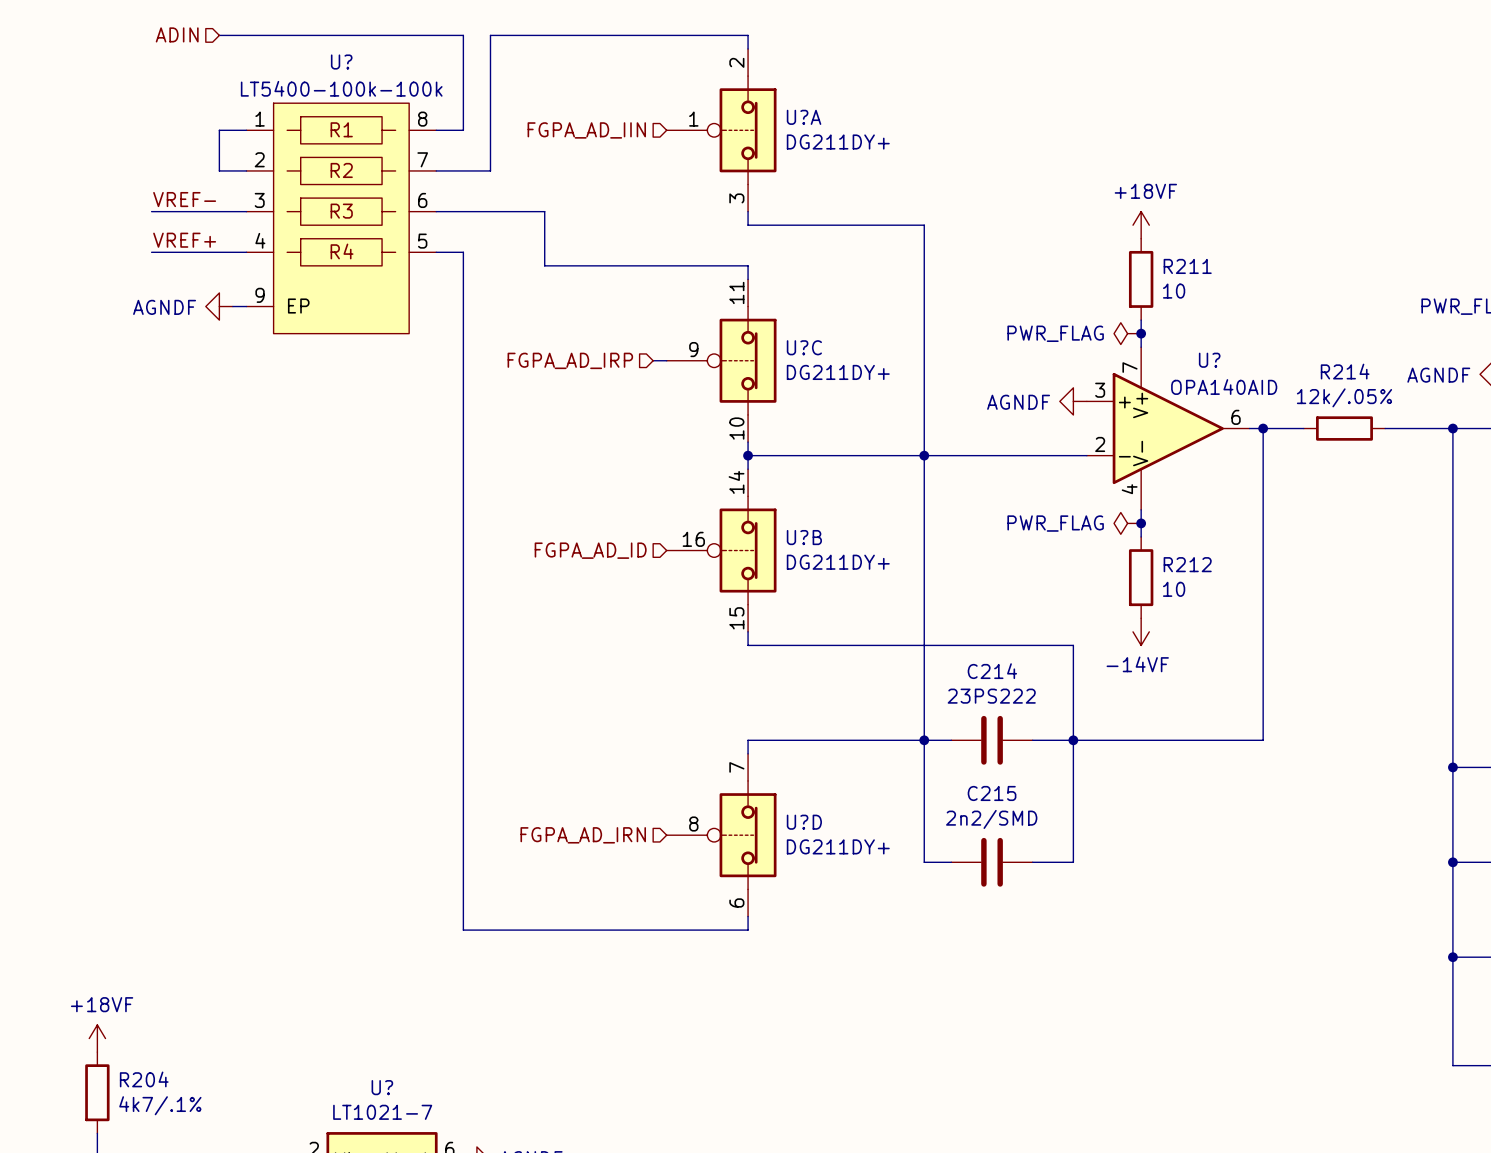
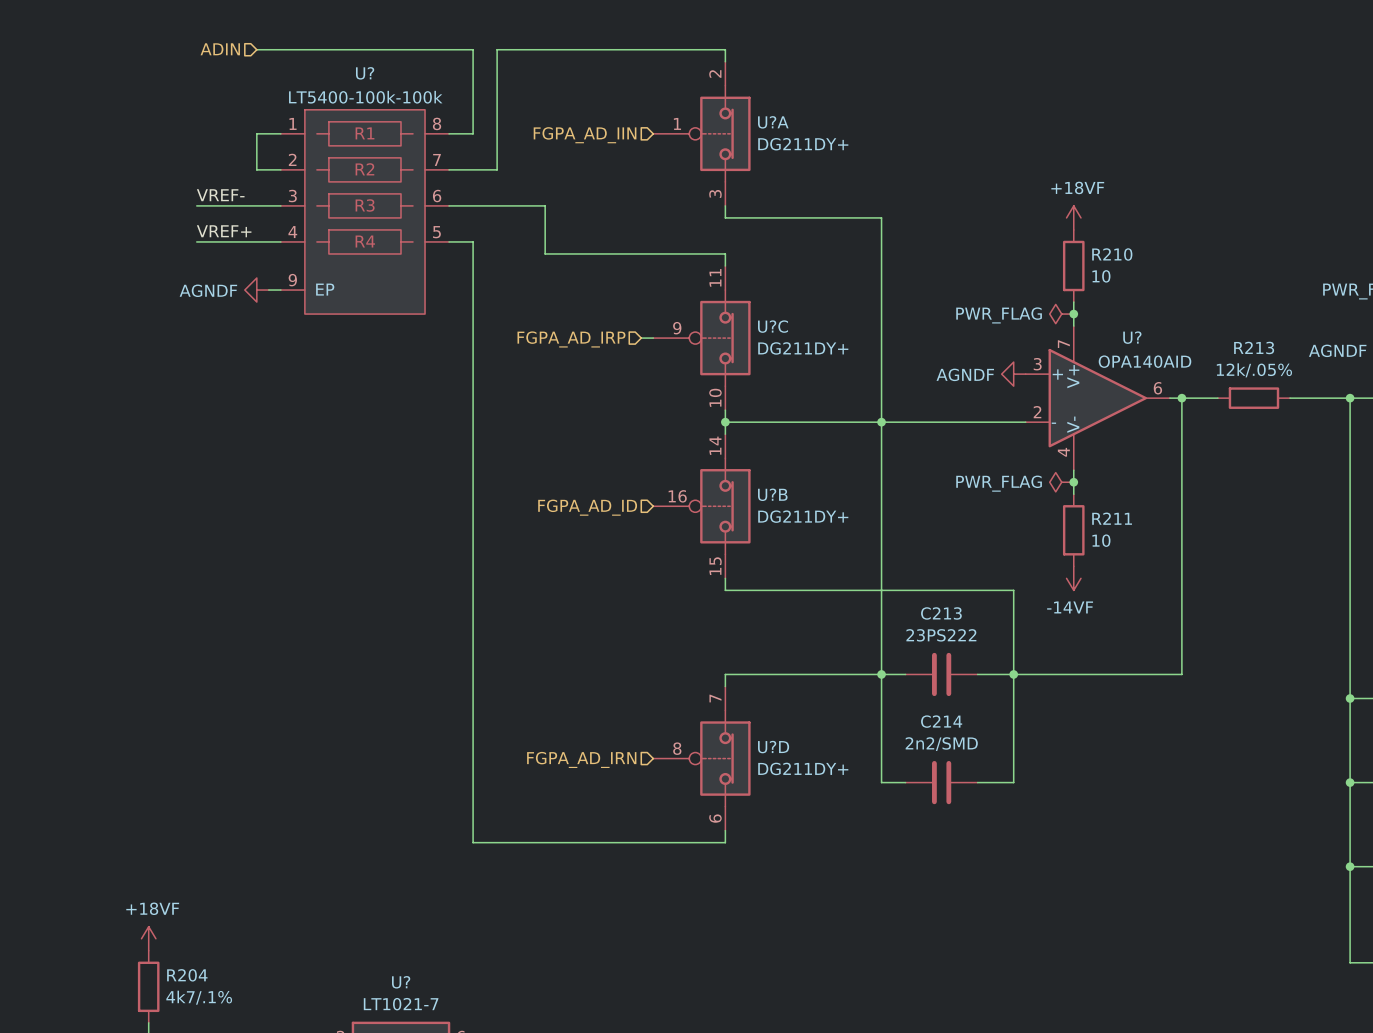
R211 name: R211 (1187, 266) -> R210 (1112, 254)
R214 name: R214 (1345, 371) -> R213 (1254, 347)
R212 name: R212 (1187, 564) -> R211 (1112, 518)
C214 name: C214 (992, 671) -> C213 (941, 613)
C215 name: C215 (992, 793) -> C214 (941, 721)

